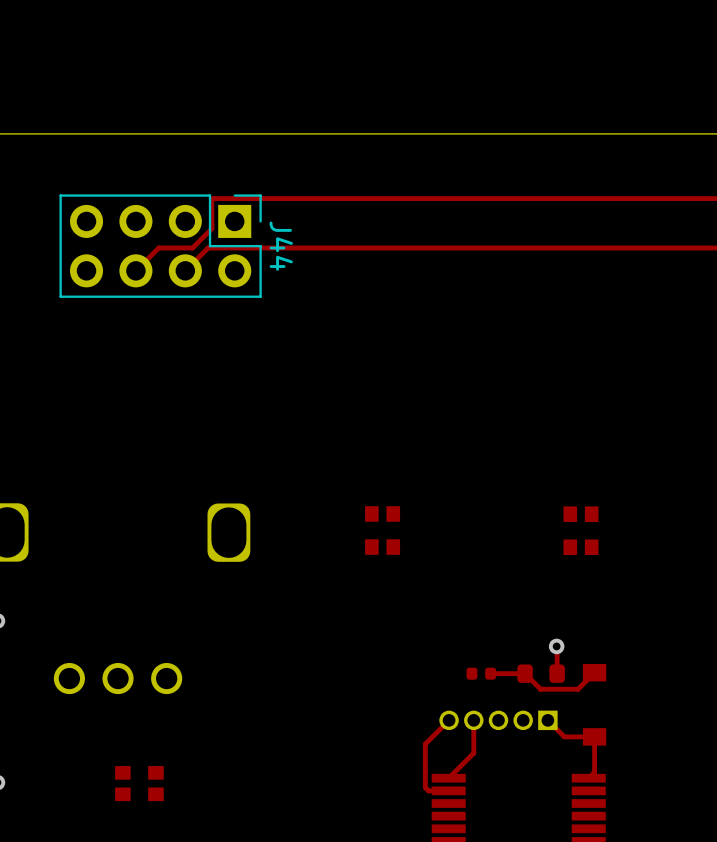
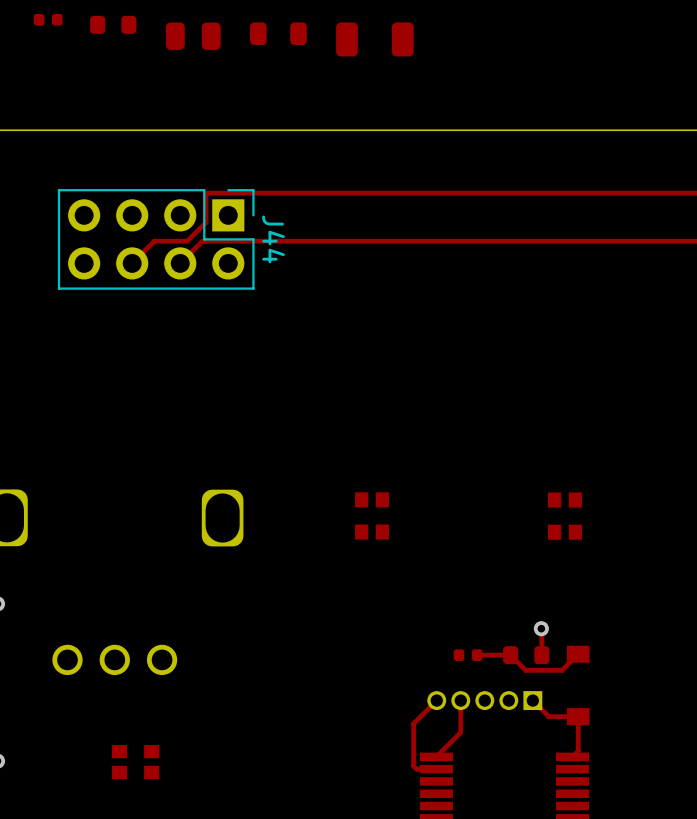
part: none -> (48, 19)
part: none -> (113, 24)
part: none -> (278, 33)
part: none -> (193, 36)
part: none -> (374, 39)

